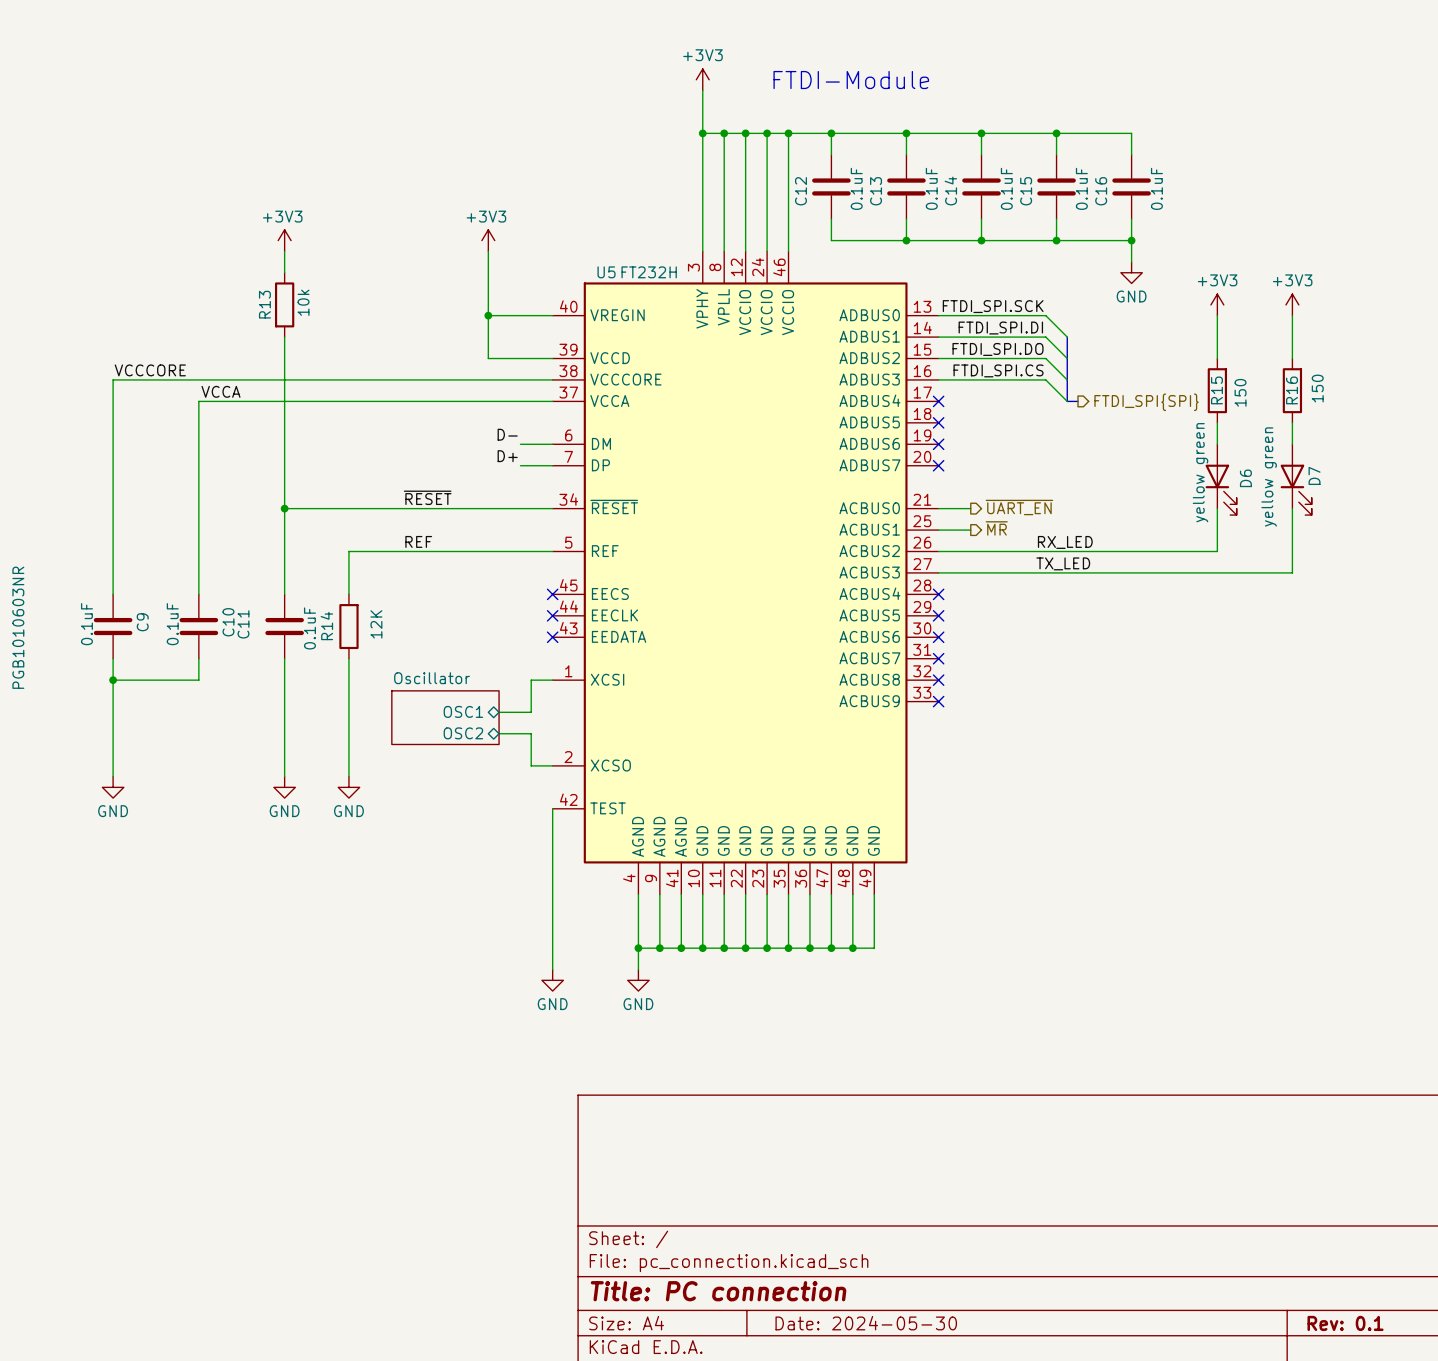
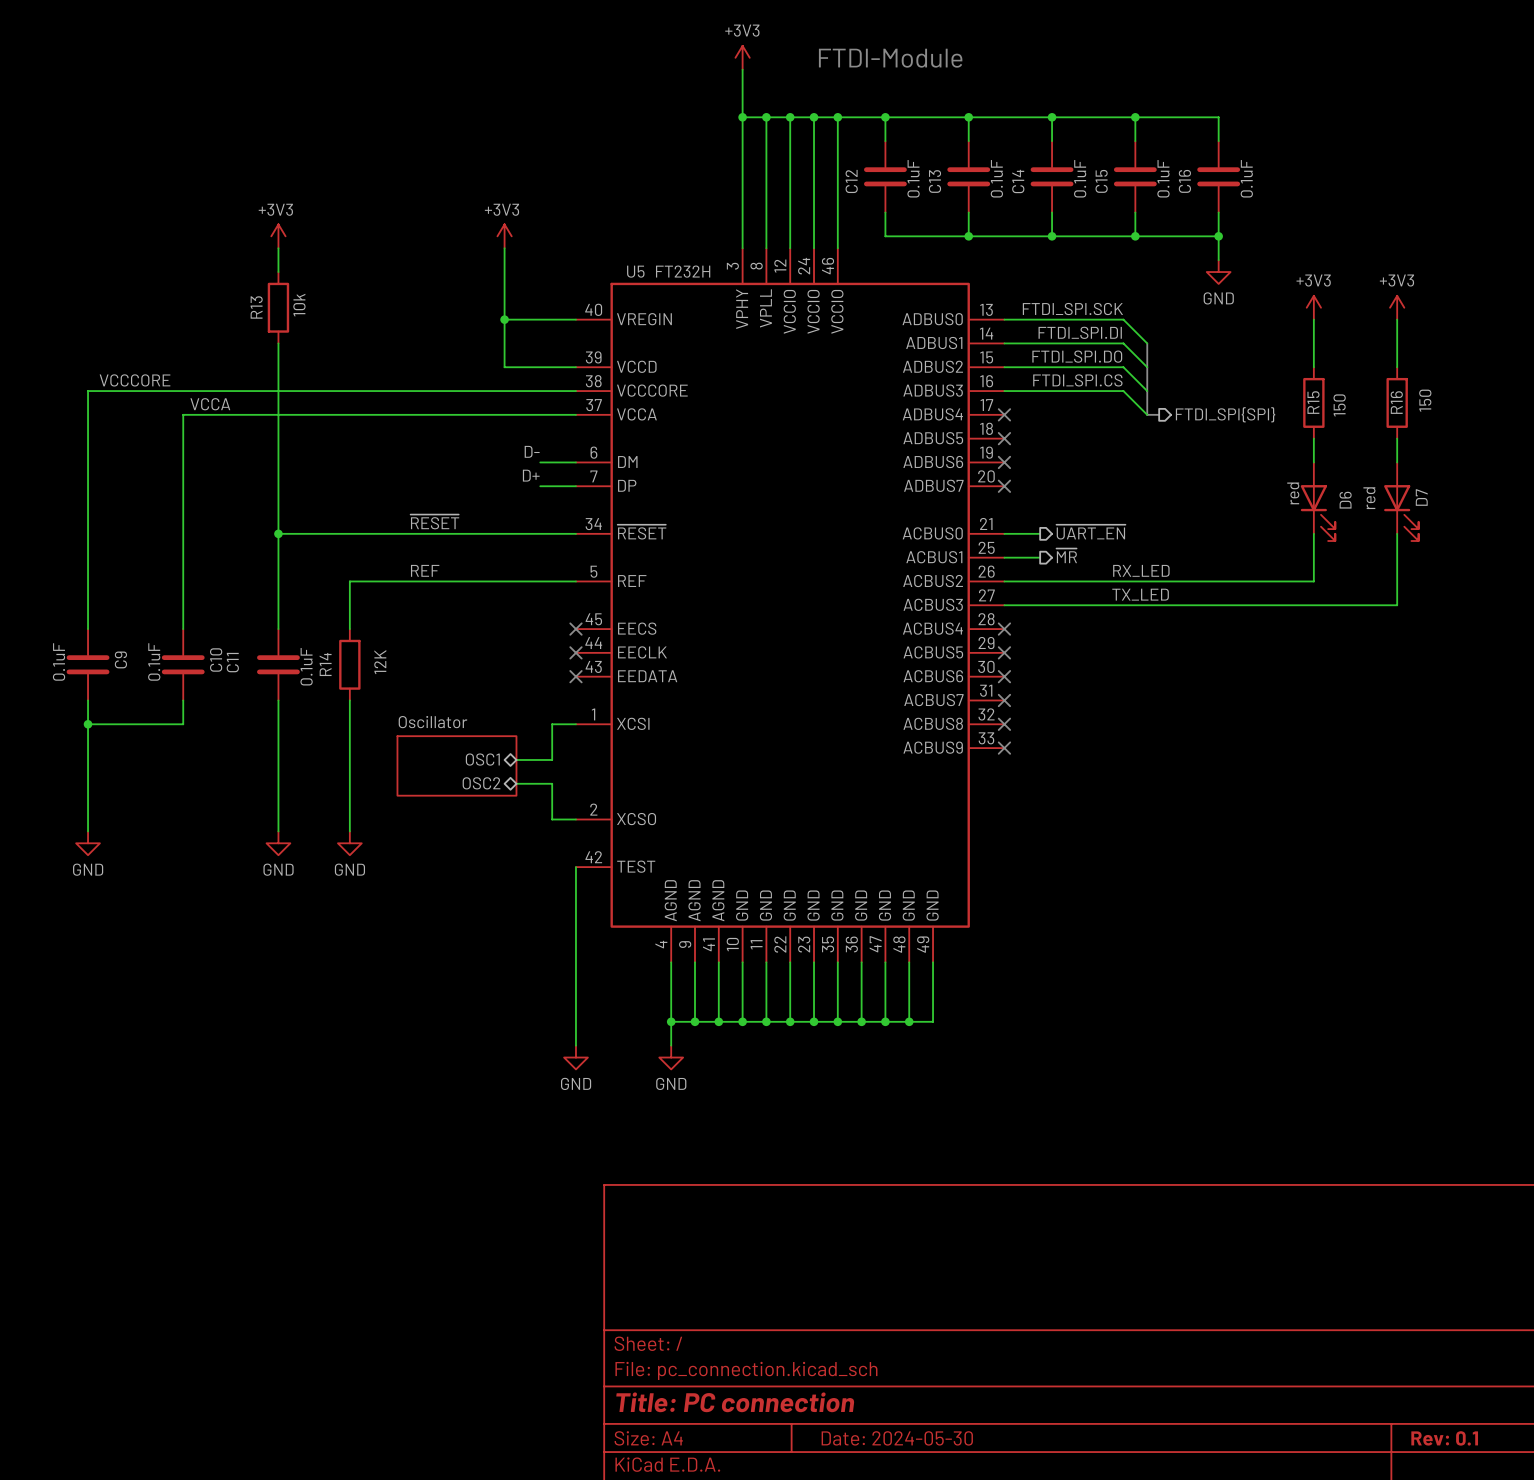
D6 value: yellow green (1200, 472) -> red (1293, 493)
D7 value: yellow green (1269, 476) -> red (1369, 498)

